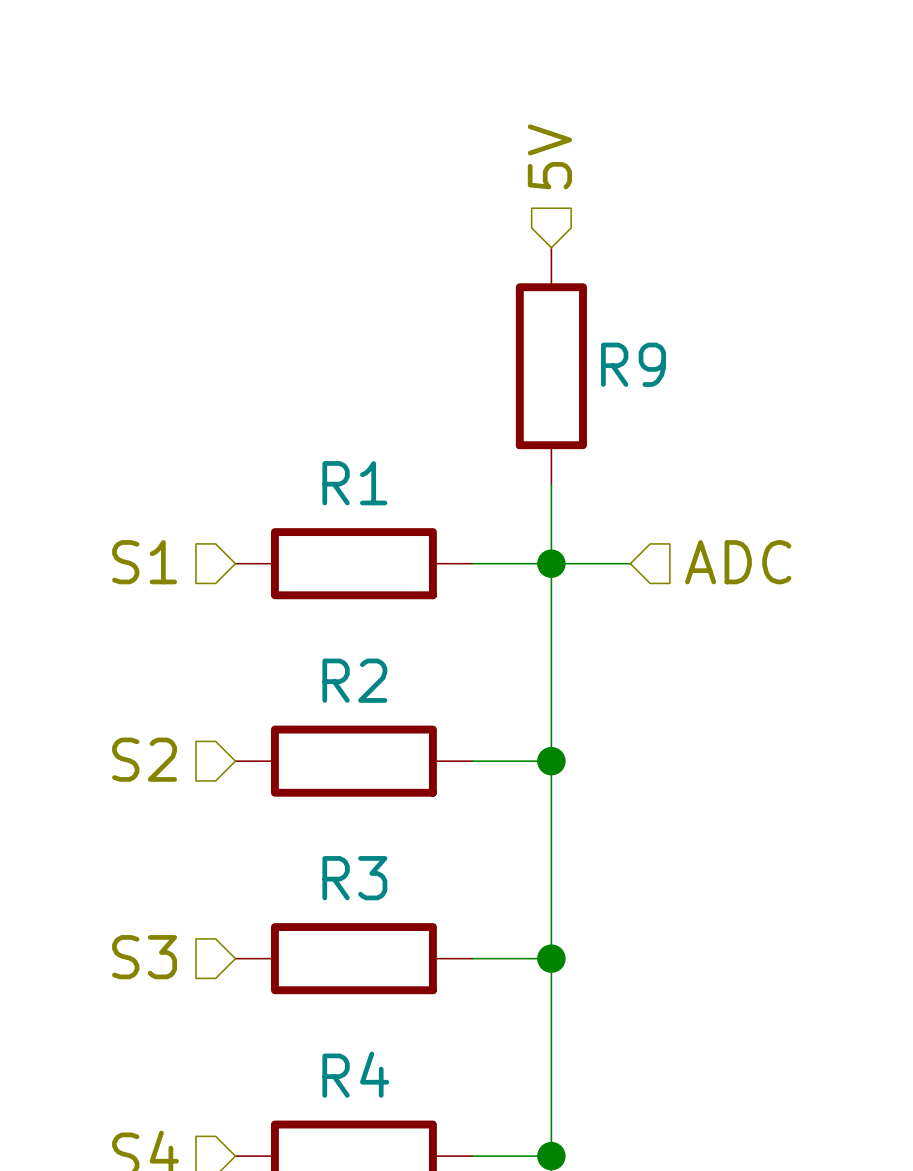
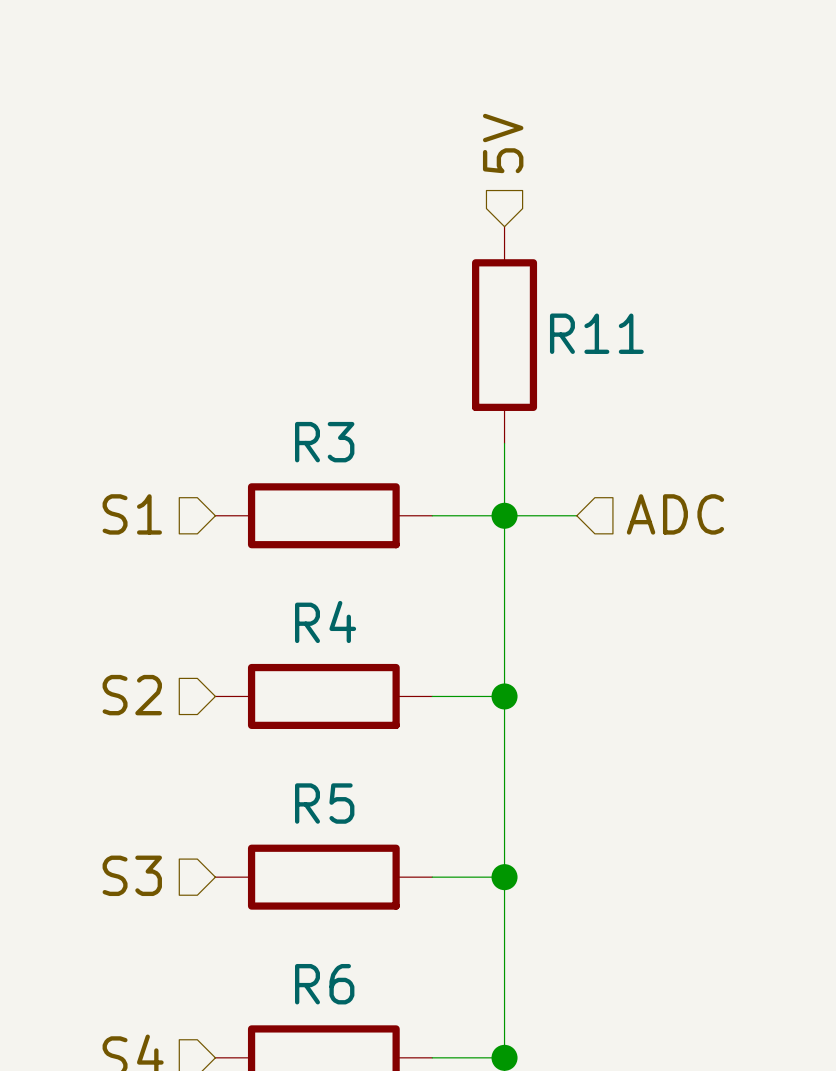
R9 name: R9 (633, 364) -> R11 (596, 333)
R1 name: R1 (354, 483) -> R3 (324, 442)
R2 name: R2 (354, 680) -> R4 (325, 621)
R3 name: R3 (354, 878) -> R5 (324, 803)
R4 name: R4 (355, 1074) -> R6 (324, 984)

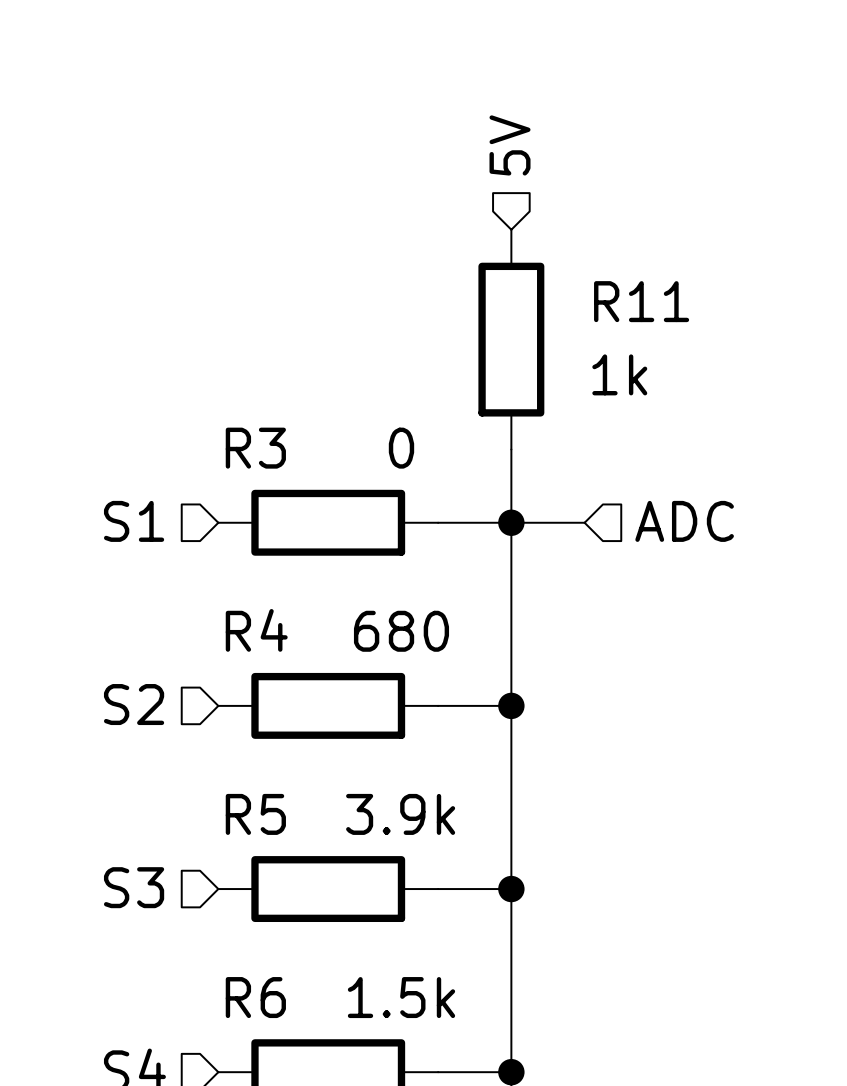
R11 name position: R11 (596, 333) -> R11 (641, 301)
R11 value: none -> 1k (619, 374)
R3 name position: R3 (324, 442) -> R3 (255, 448)
R3 value: none -> 0 (401, 448)
R4 name position: R4 (325, 621) -> R4 (256, 630)
R4 value: none -> 680 (401, 631)
R5 name position: R5 (324, 803) -> R5 (255, 814)
R5 value: none -> 3.9k (400, 814)
R6 name position: R6 (324, 984) -> R6 (255, 997)
R6 value: none -> 1.5k (401, 997)

